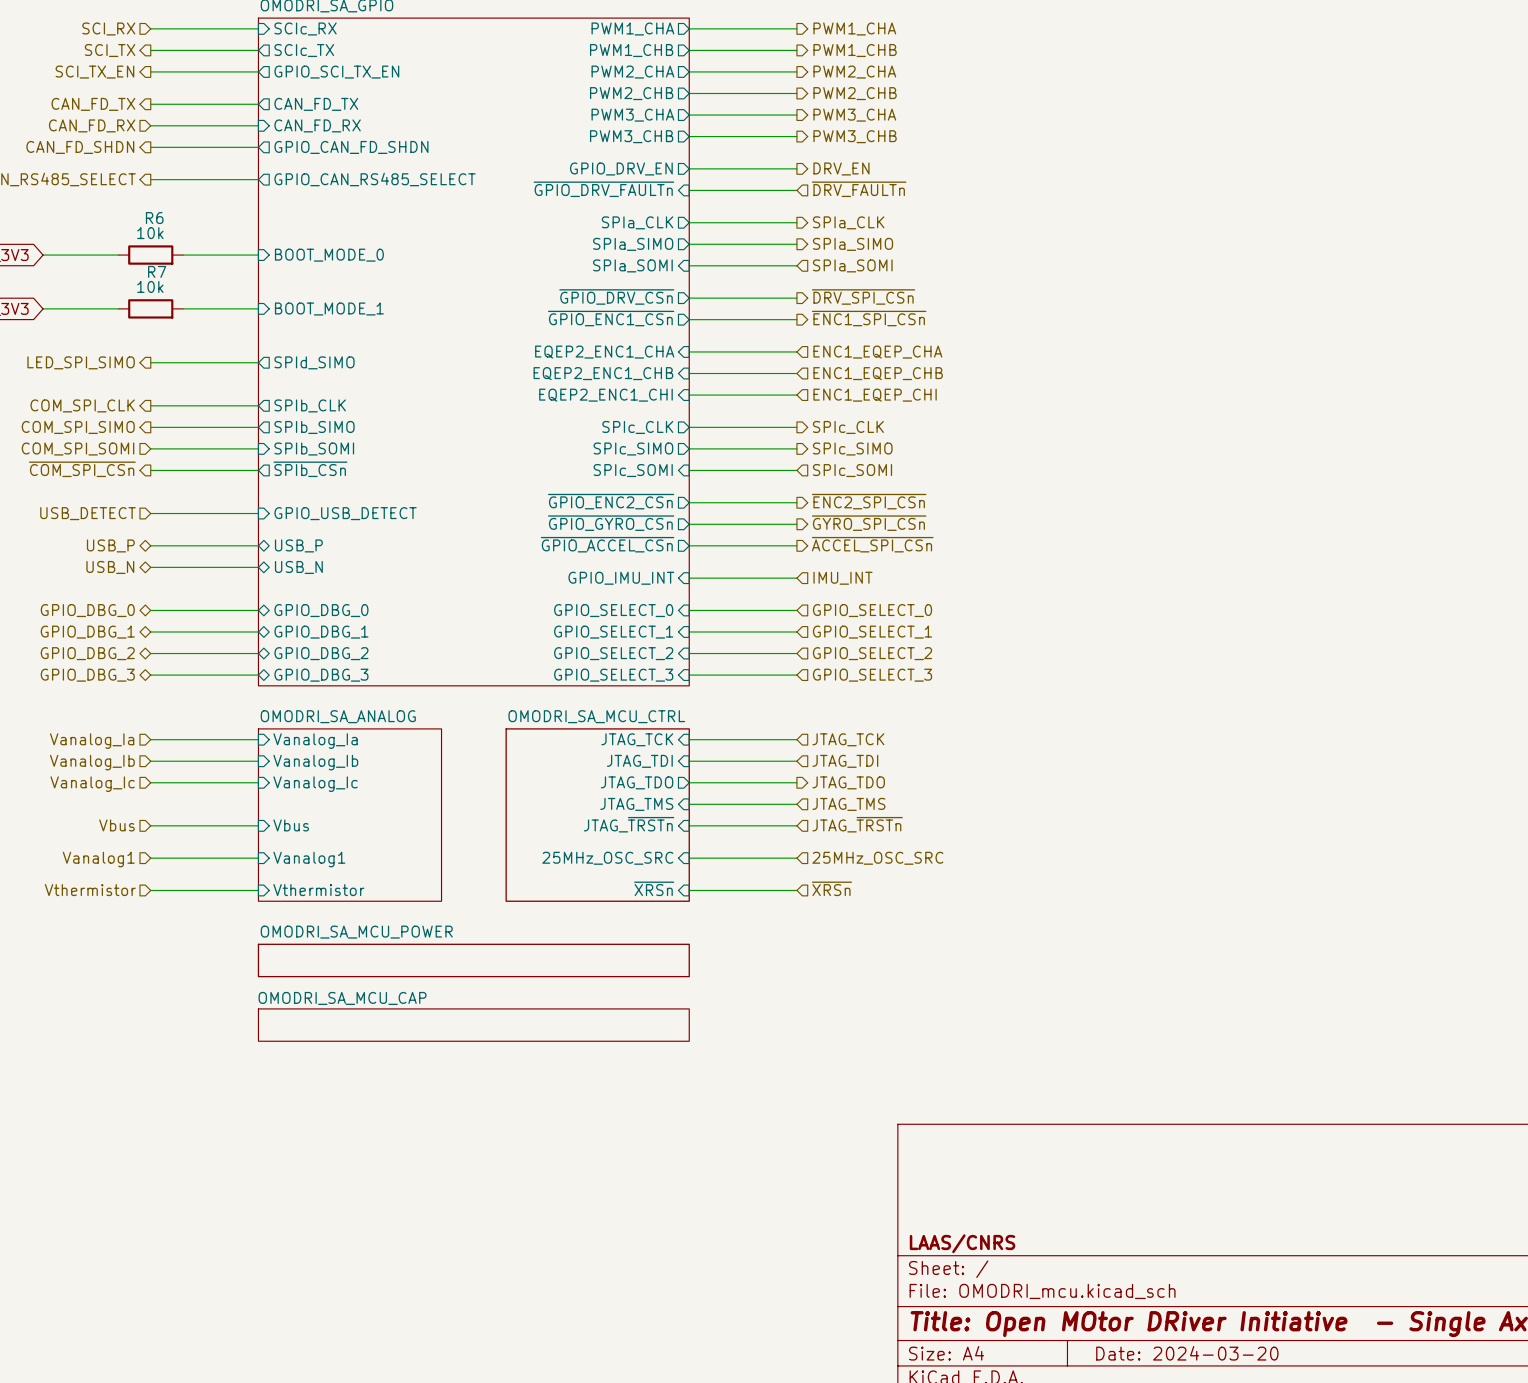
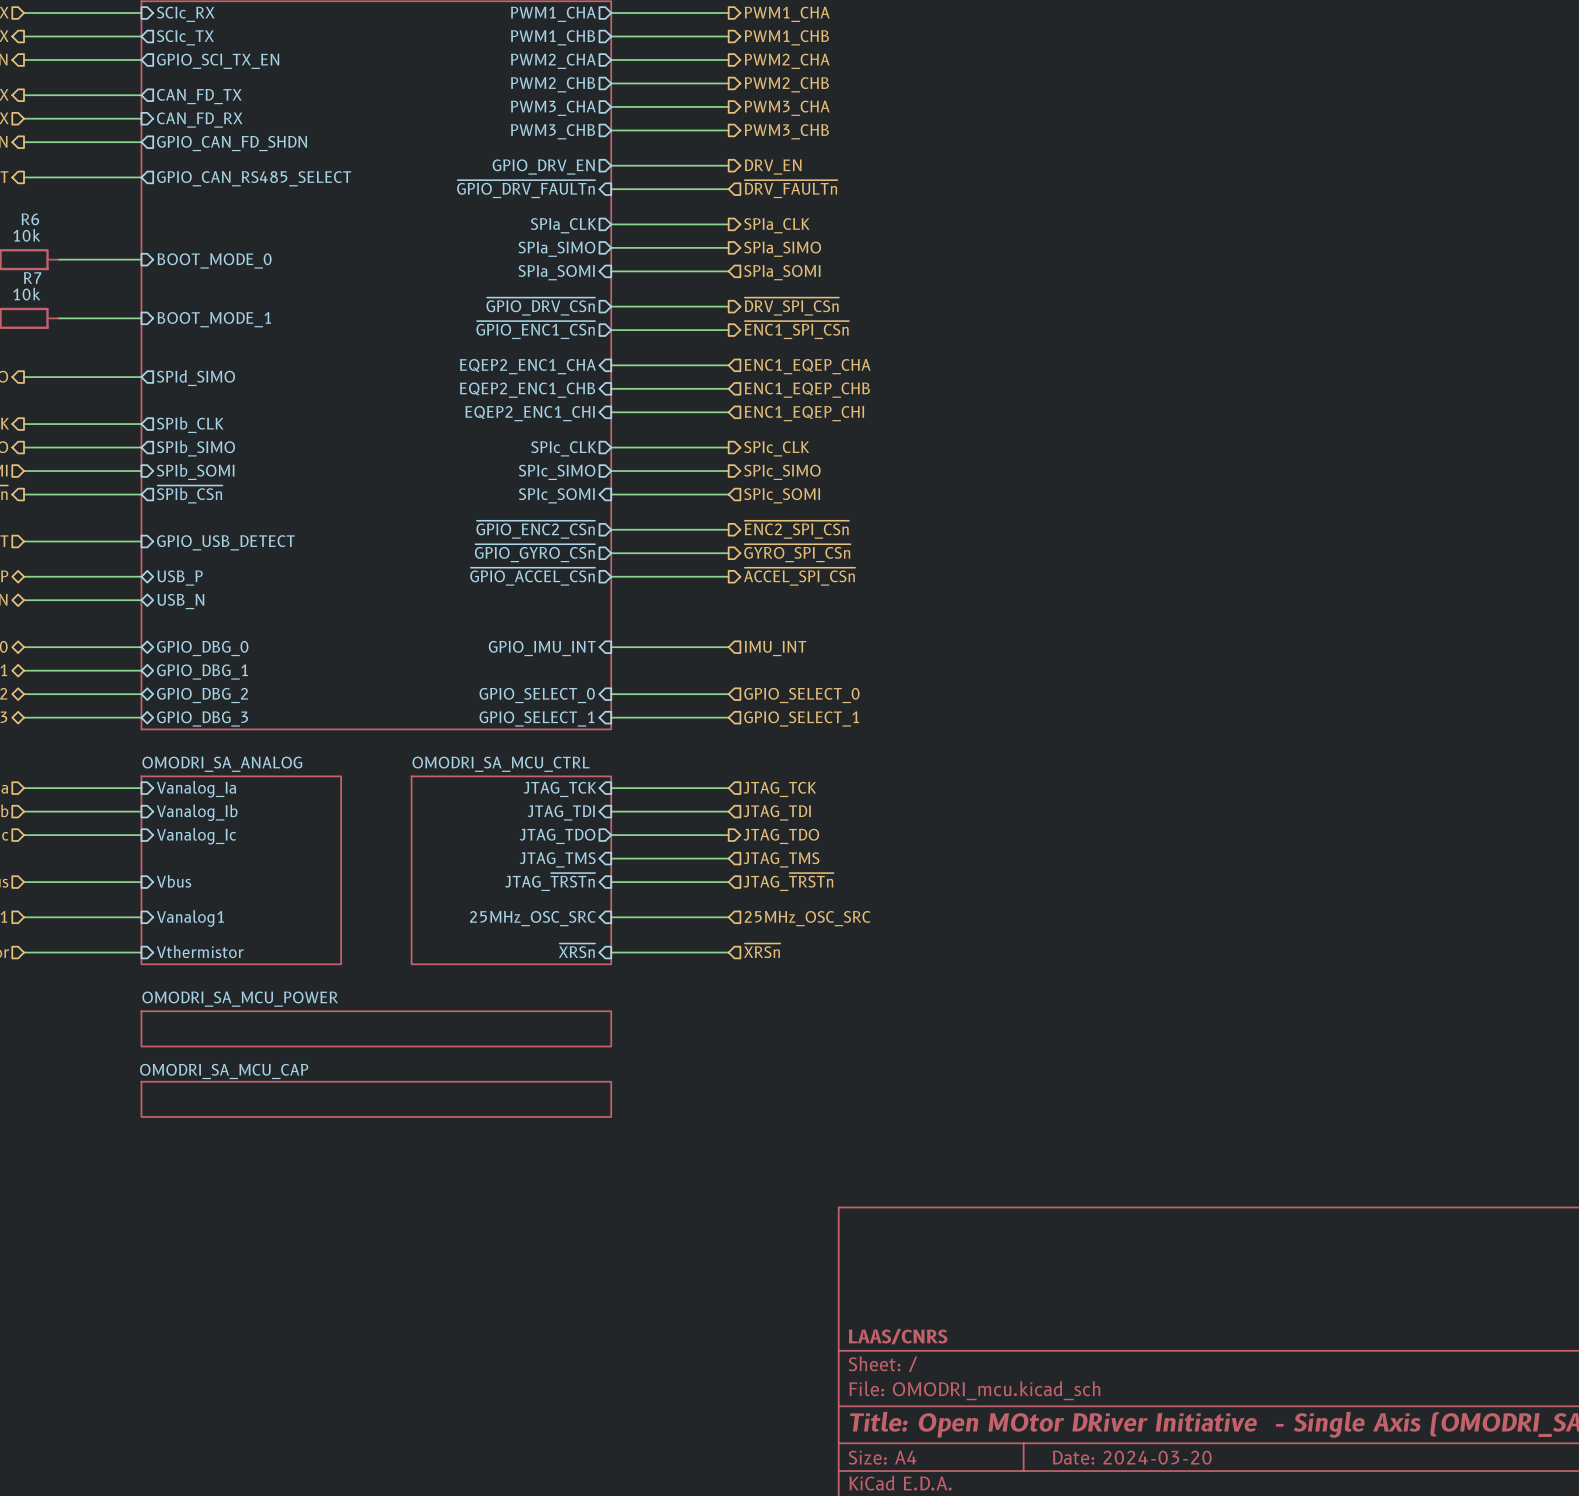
sheet pin: GPIO_IMU_INT (621, 578) -> none
wire: (689, 578) (796, 578) -> none
hierarchical label: IMU_INT (843, 578) -> none
sheet pin: GPIO_SELECT_0 (613, 610) -> GPIO_IMU_INT (542, 648)
hierarchical label: GPIO_SELECT_0 (872, 610) -> IMU_INT (775, 648)
wire: (689, 631) (796, 631) -> none
sheet pin: GPIO_SELECT_1 (613, 632) -> none
hierarchical label: GPIO_SELECT_1 (872, 632) -> none
sheet pin: GPIO_SELECT_2 (613, 653) -> GPIO_SELECT_0 (537, 695)
hierarchical label: GPIO_SELECT_2 (872, 653) -> GPIO_SELECT_0 (801, 695)
sheet pin: GPIO_SELECT_3 (613, 675) -> GPIO_SELECT_1 (536, 718)
hierarchical label: GPIO_SELECT_3 (872, 675) -> GPIO_SELECT_1 (801, 718)

